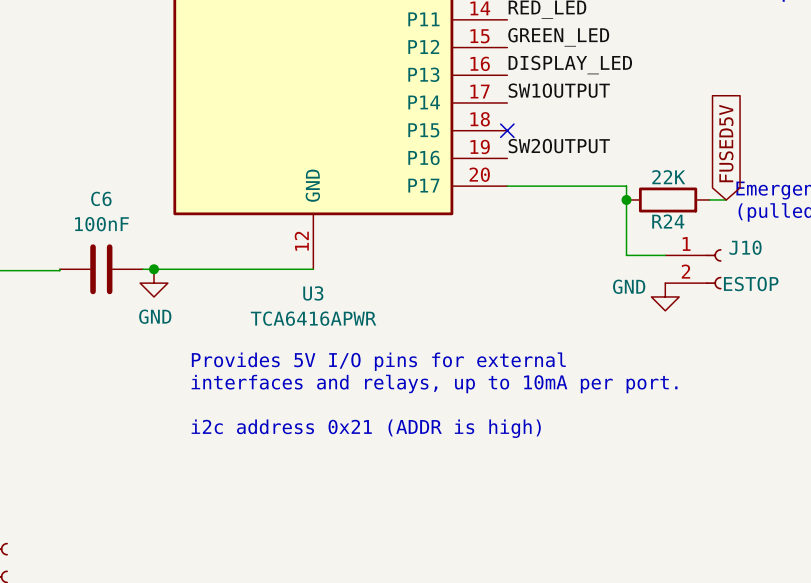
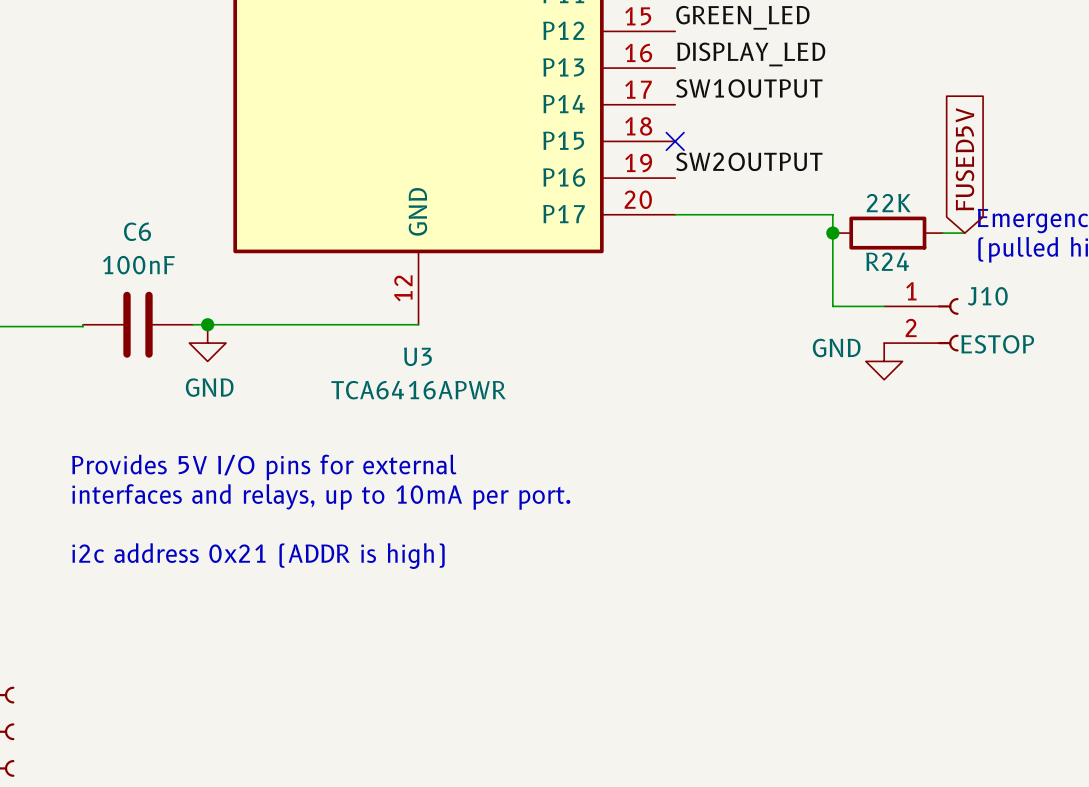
text position: Provides 5V I/O pins for external (378, 361) -> Provides 5V I/O pins for external (264, 467)
text position: interfaces and relays, up to 10mA per port. (434, 383) -> interfaces and relays, up to 10mA per port. (321, 496)
text position: i2c address 0x21 (ADDR is high) (366, 428) -> i2c address 0x21 (ADDR is high) (258, 556)

